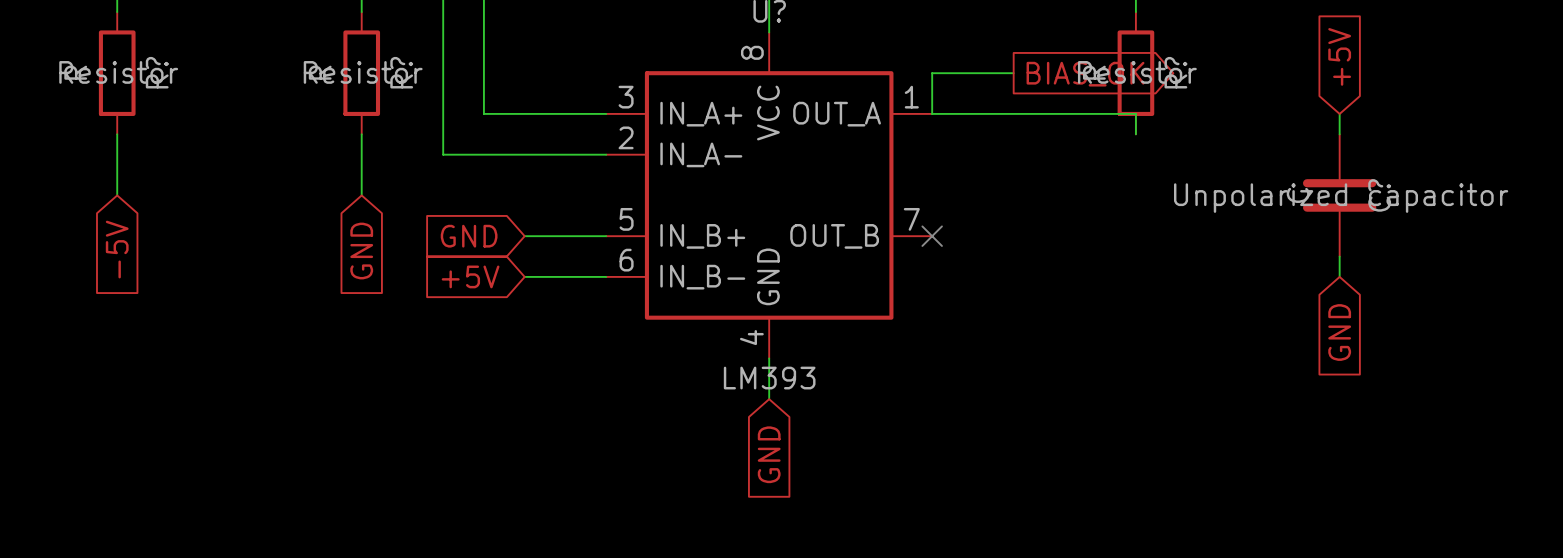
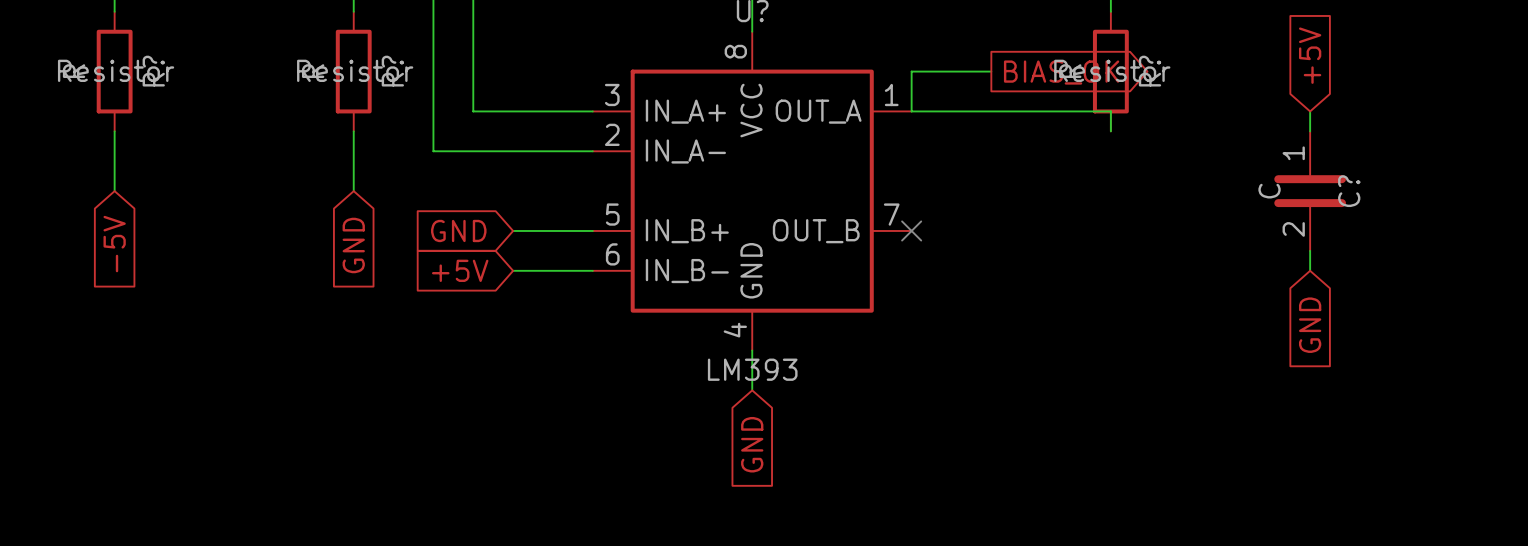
C? pin number: none -> 1 (1293, 153)
C? text: Unpolarized capacitor (1341, 198) -> none
C? pin number: none -> 2 (1293, 229)

